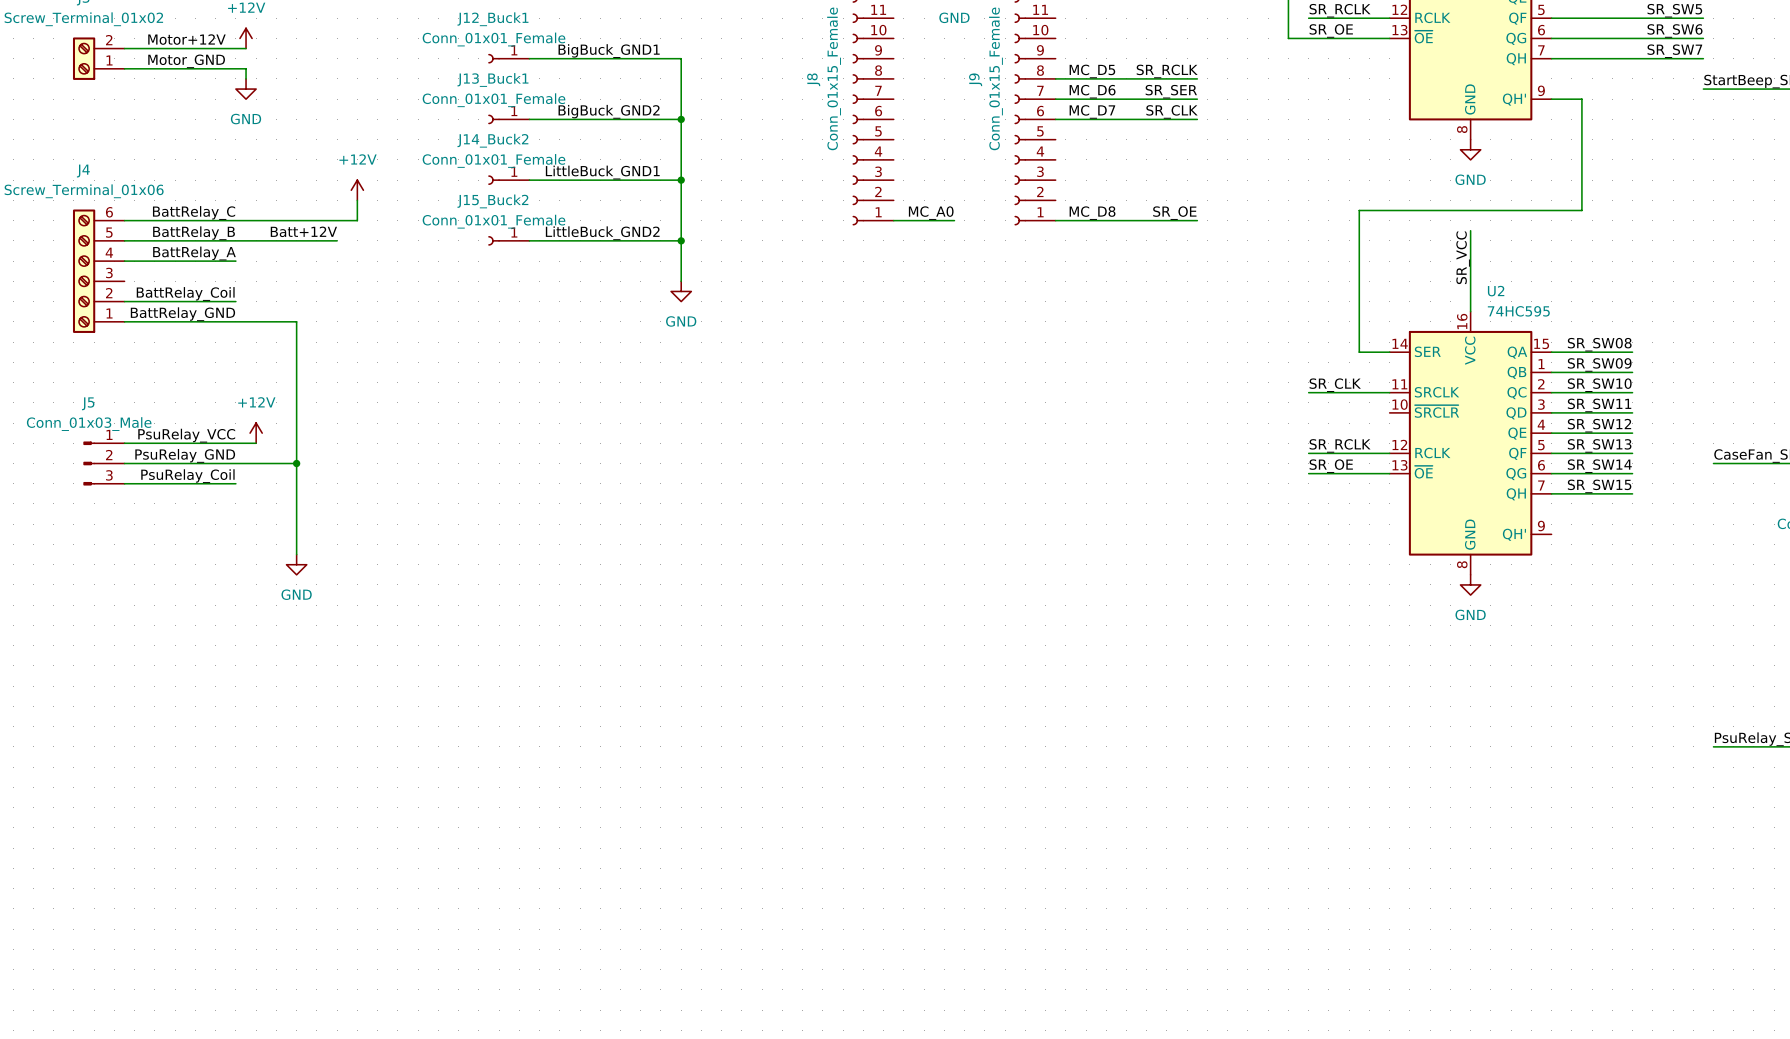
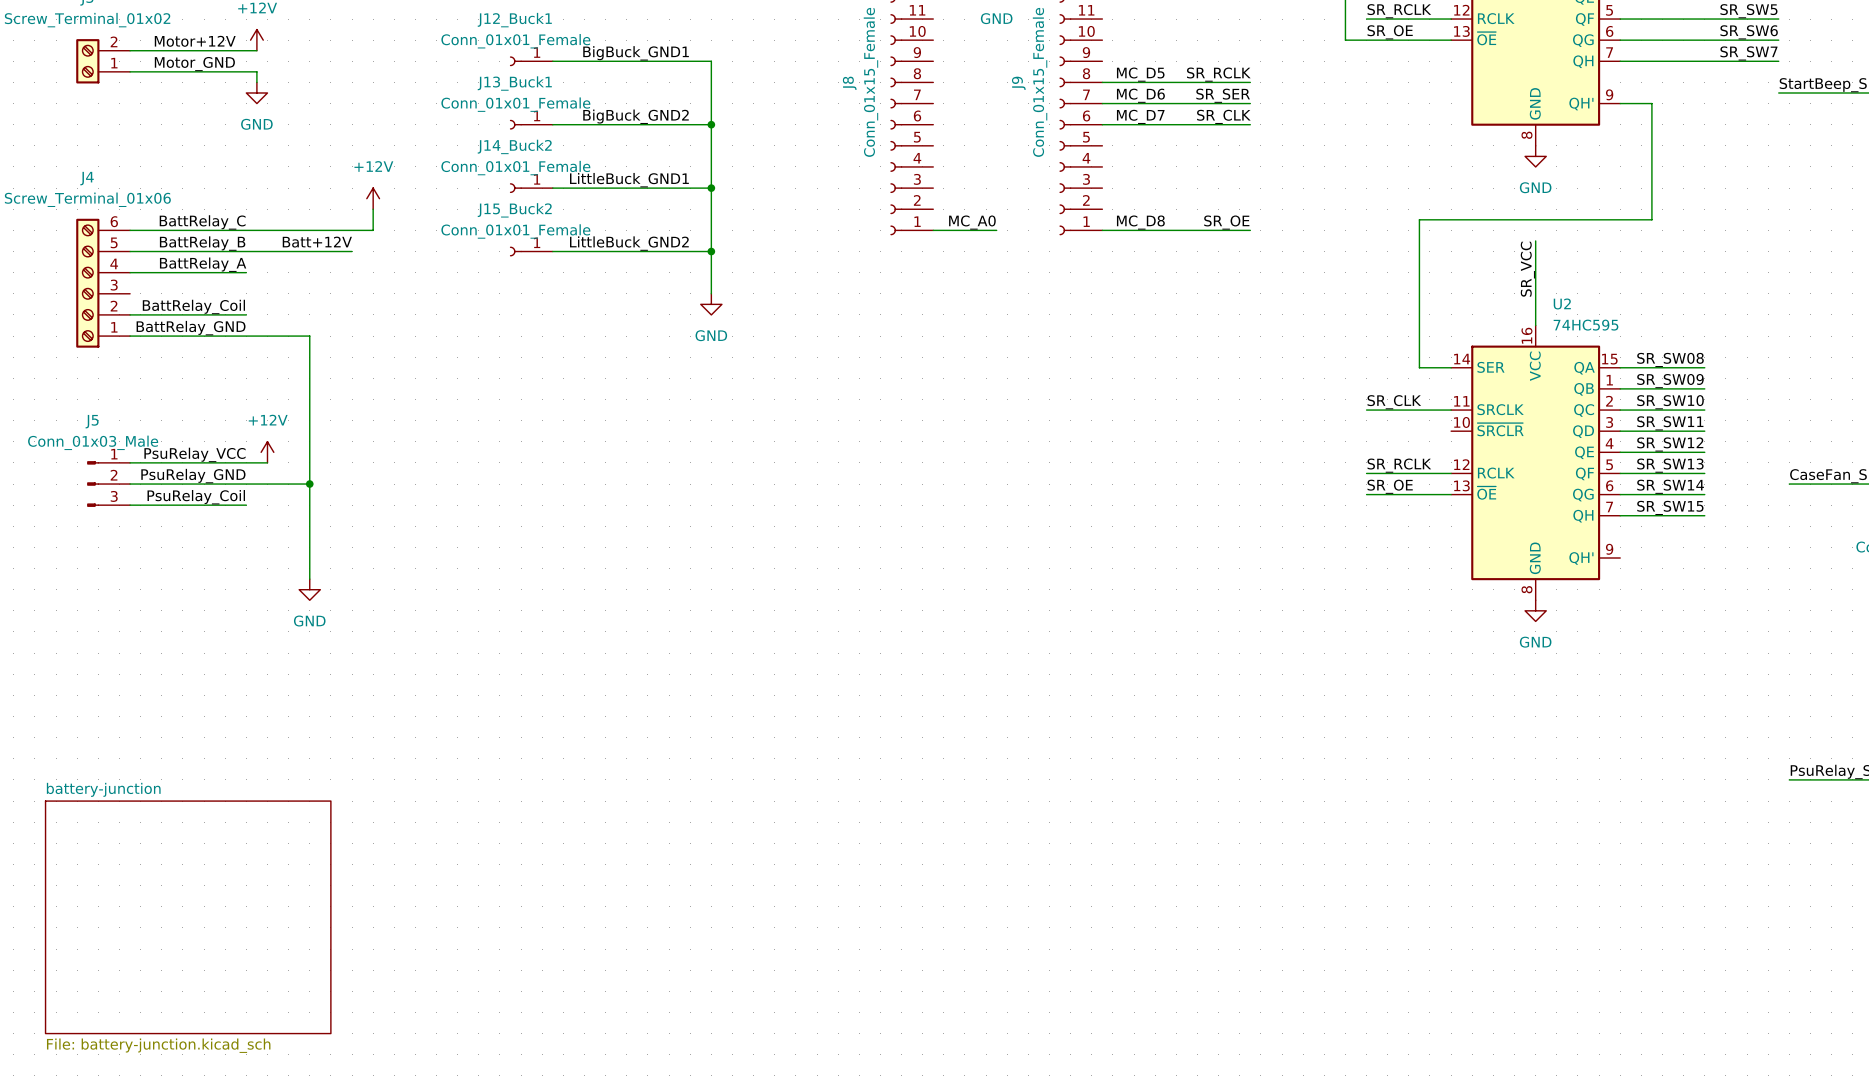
sheet battery-junction: none -> File: battery-junction.kicad_sch (188, 917)

